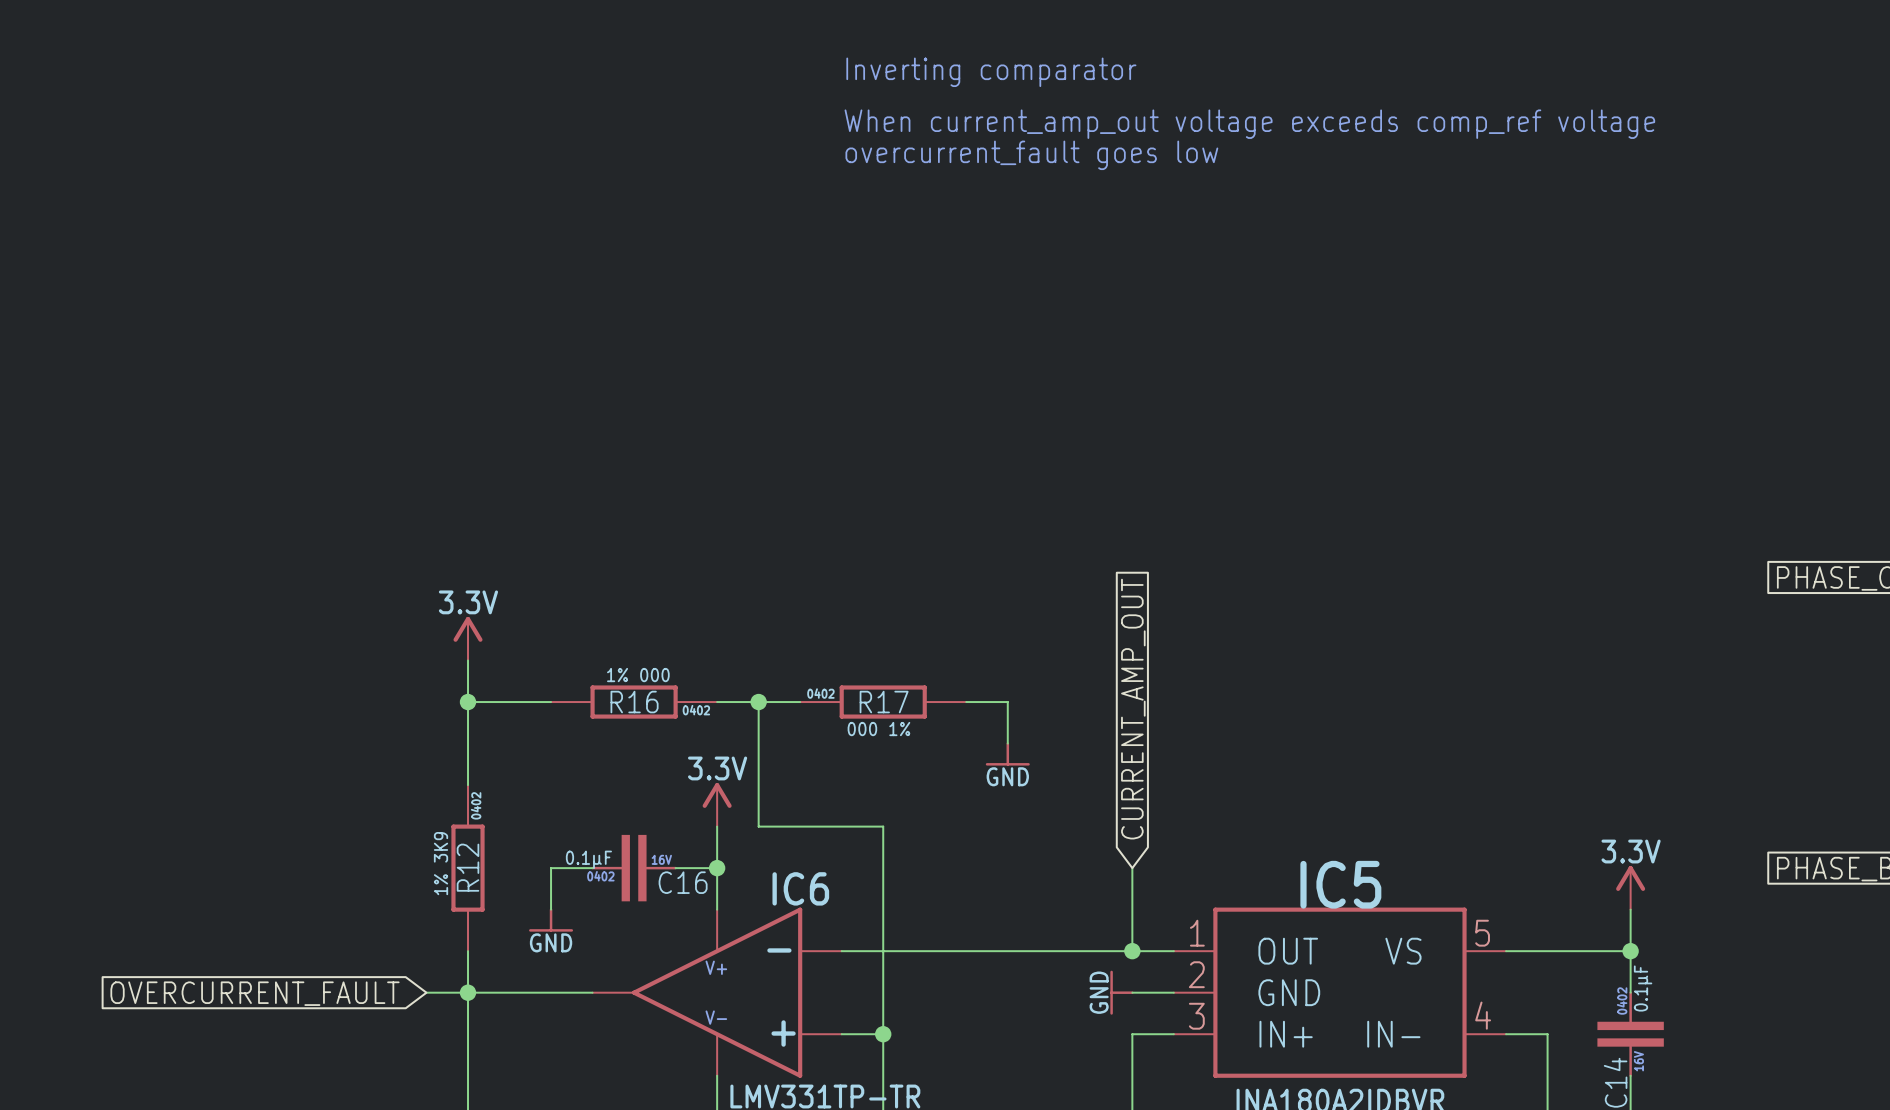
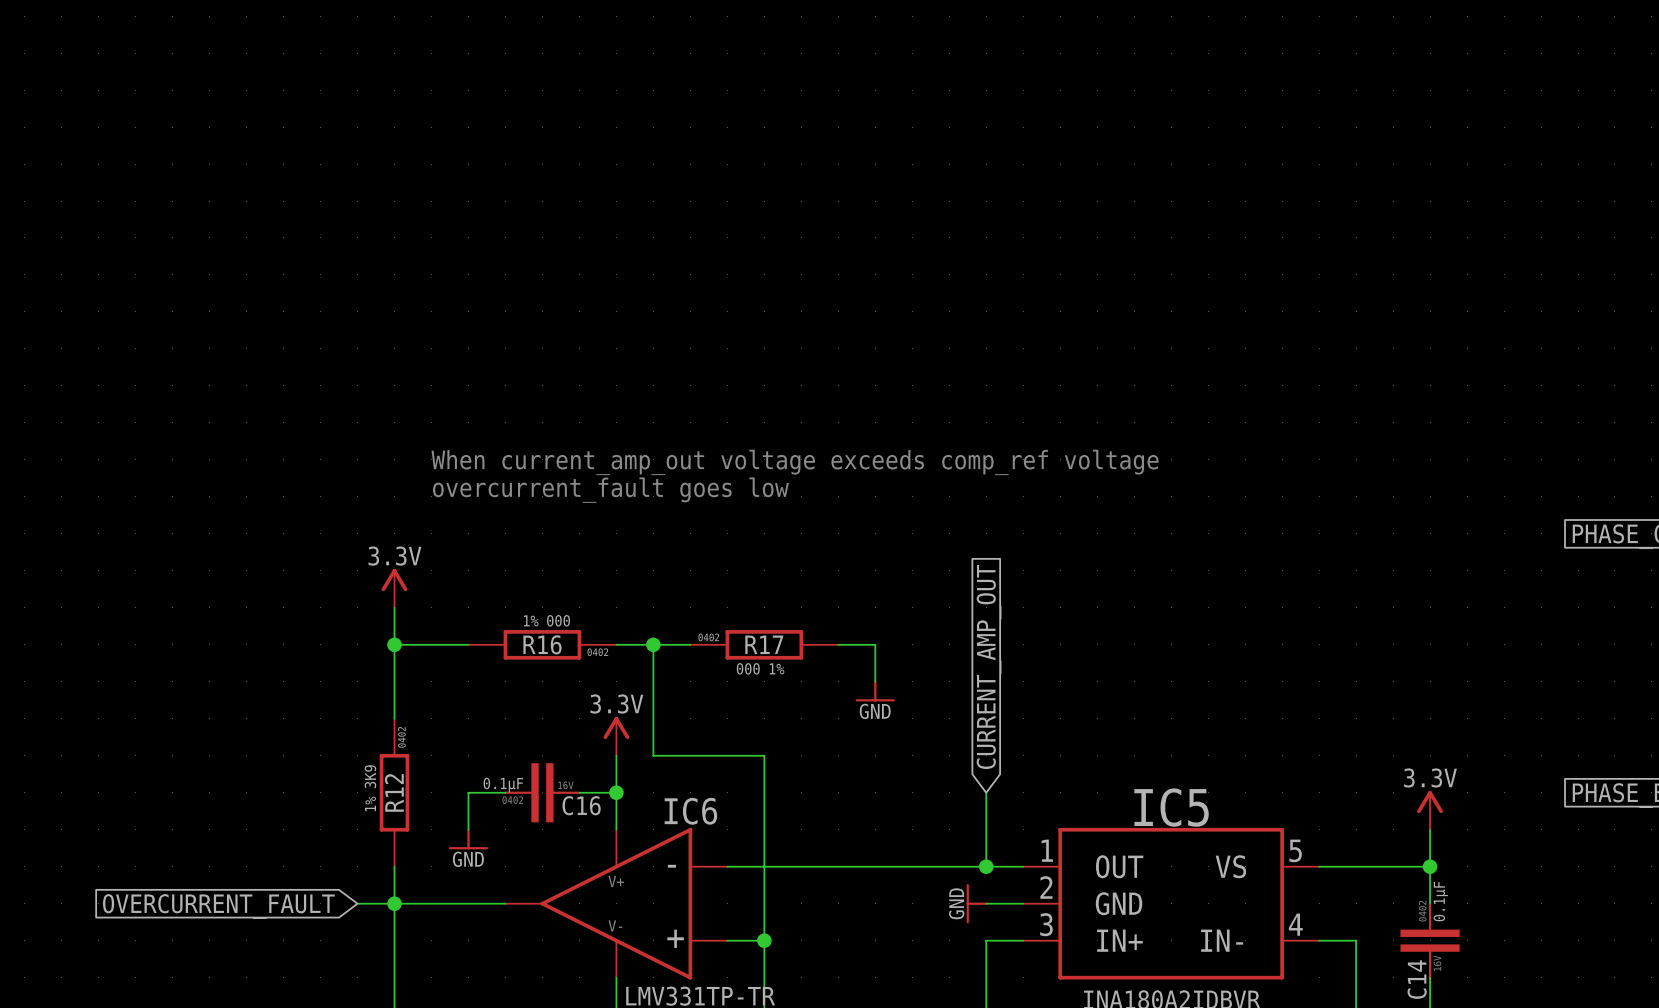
text: Inverting comparator (991, 72) -> none
text: When current_amp_out voltage exceeds comp_ref voltage (1249, 124) -> none
text: overcurrent_fault goes low (1031, 155) -> none
text: none -> When current_amp_out voltage exceeds comp_ref voltage (795, 462)
text: none -> overcurrent_fault goes low (610, 490)

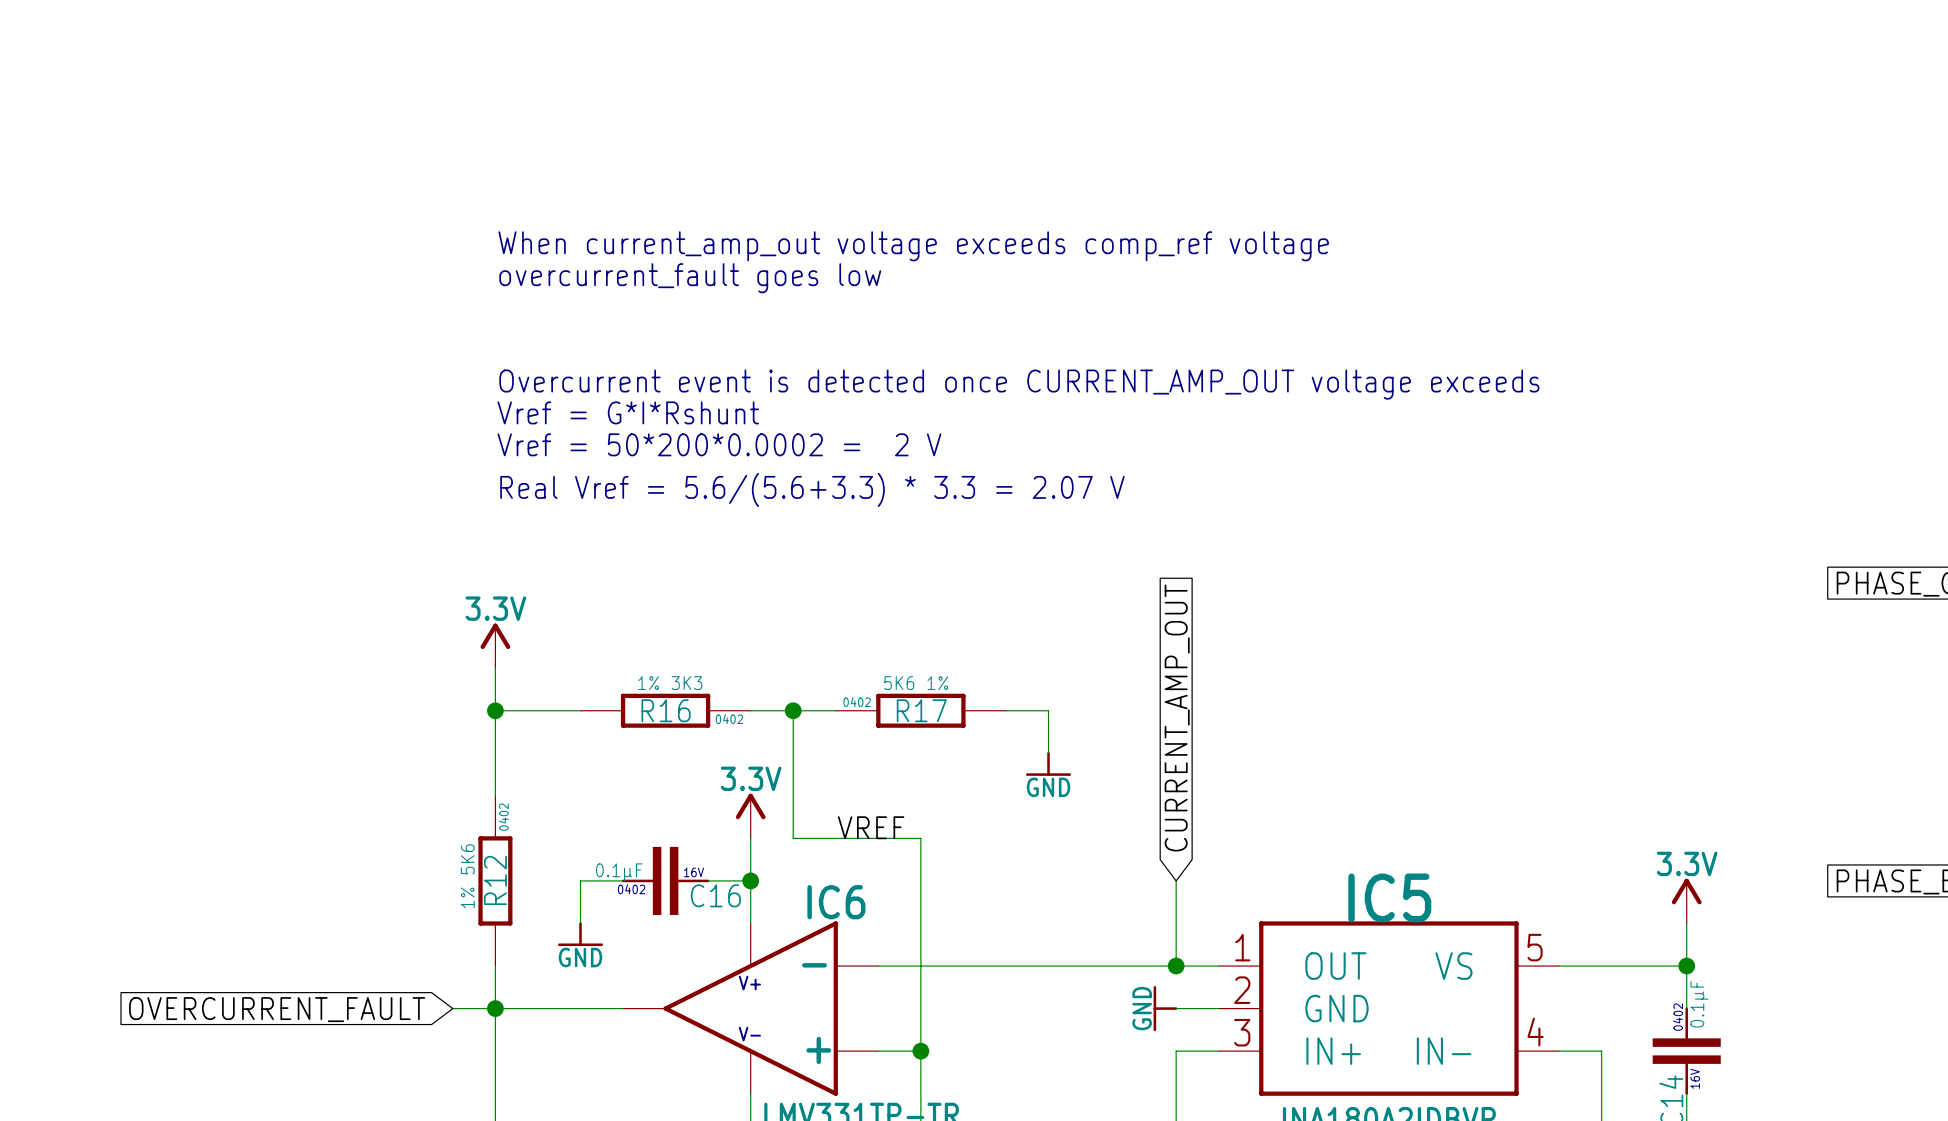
text: none -> Overcurrent event is detected once CURRENT_AMP_OUT voltage exceeds (1019, 384)
text: none -> Vref = G*I*Rshunt (628, 412)
text: none -> Vref = 50*200*0.0002 = 2 V (719, 444)
text: none -> Real Vref = 5.6/(5.6+3.3) * 3.3 = 2.07 V (812, 489)
text position: When current_amp_out voltage exceeds comp_ref voltage (795, 462) -> When current_amp_out voltage exceeds comp_ref voltage (913, 246)
text position: overcurrent_fault goes low (610, 490) -> overcurrent_fault goes low (690, 278)
R16 value: 000 (558, 620) -> 3K3 (686, 683)
R17 value: 000 (748, 668) -> 5K6 (899, 683)
R17 text position: 1% (777, 668) -> 1% (937, 683)
label: none -> VREF (871, 827)
R12 value: 3K9 (370, 776) -> 5K6 (467, 859)

